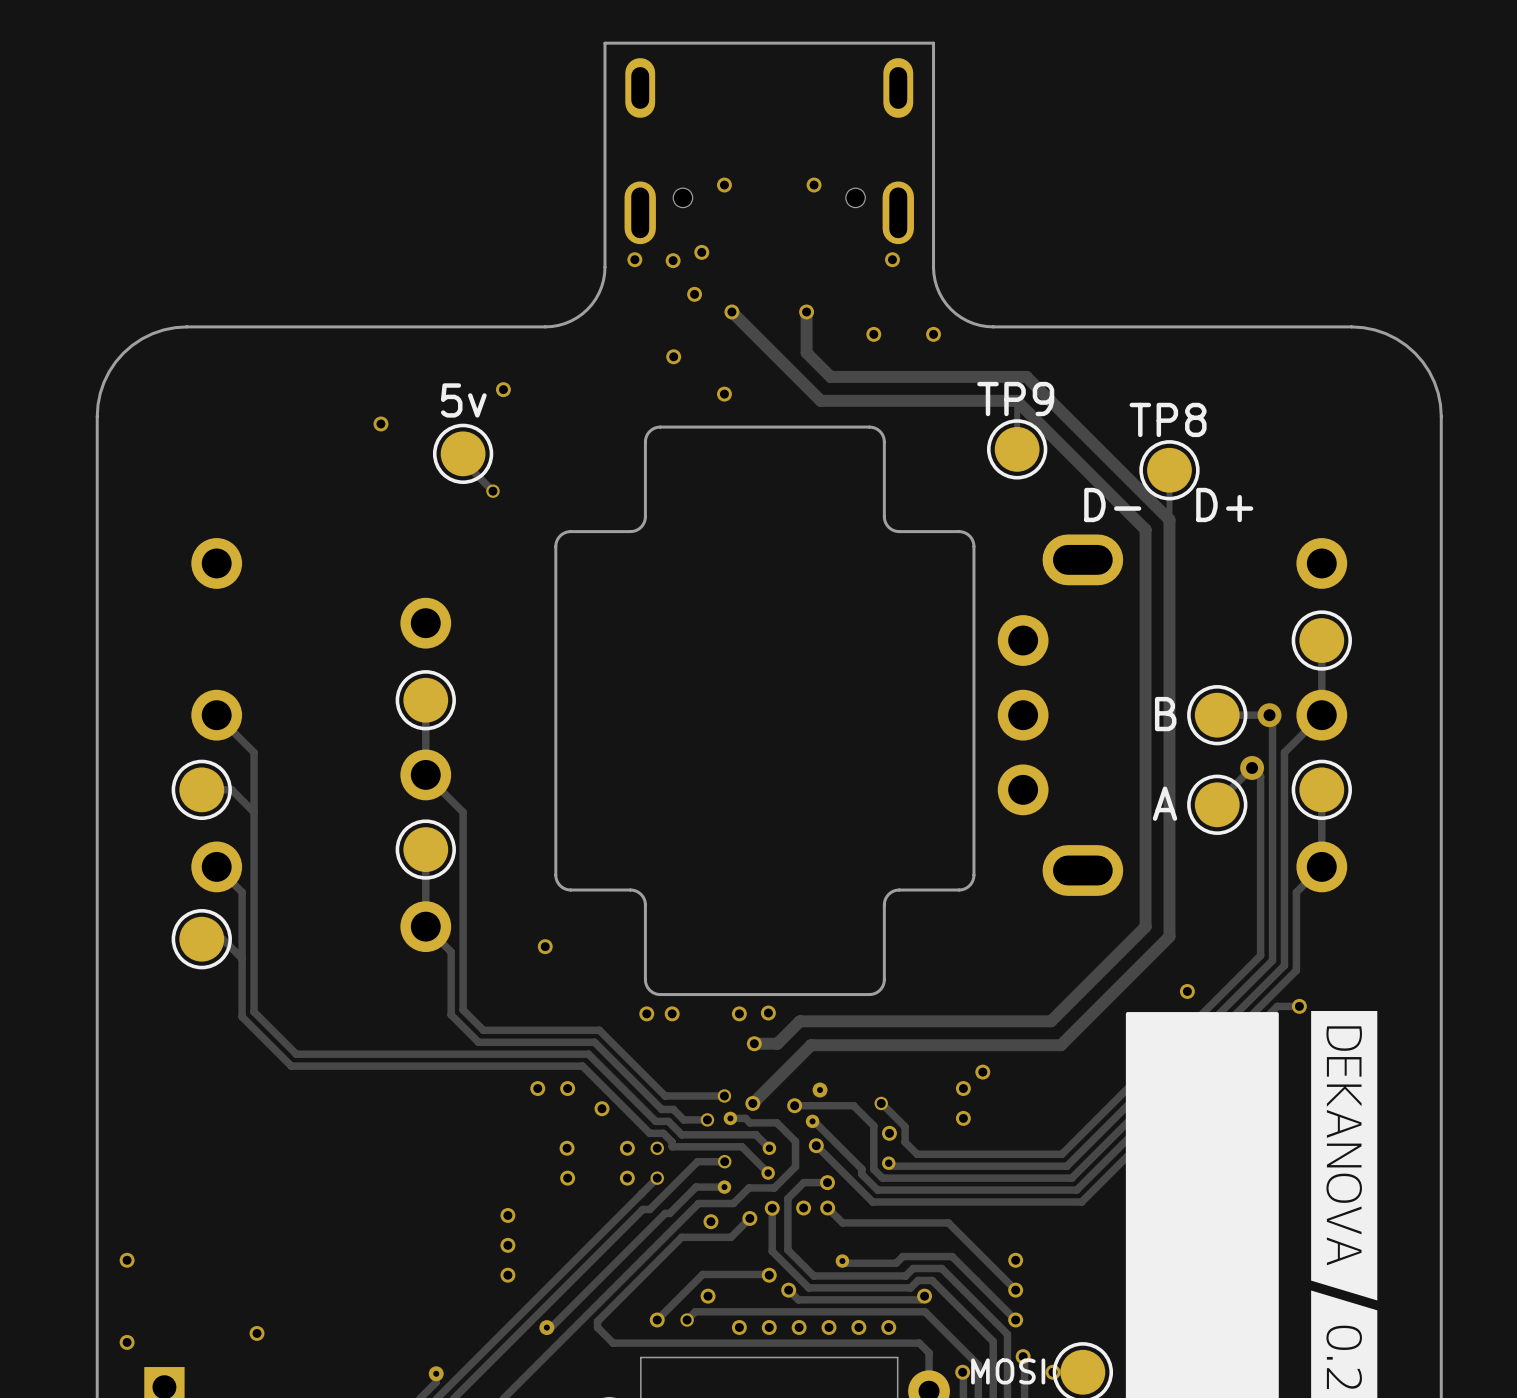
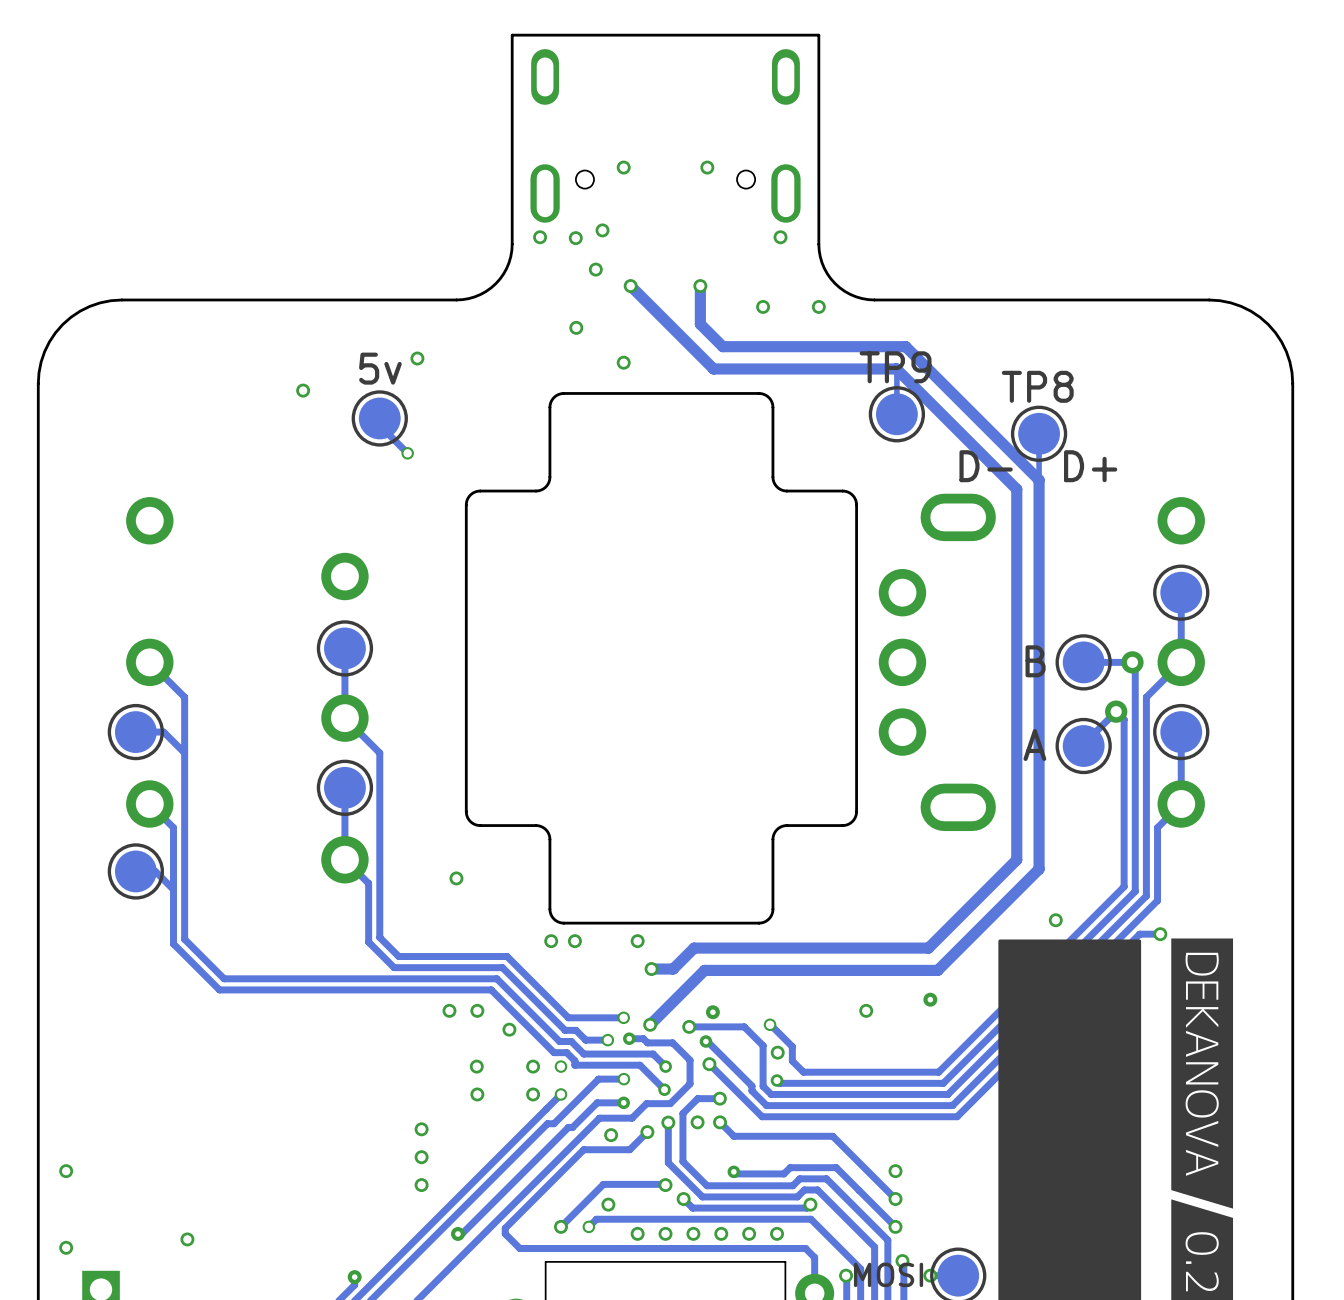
via: (768, 1013) -> none
via: (982, 1072) -> none
via: none -> (930, 999)
via: (963, 1088) -> none
via: none -> (866, 1010)
via: (963, 1118) -> none

